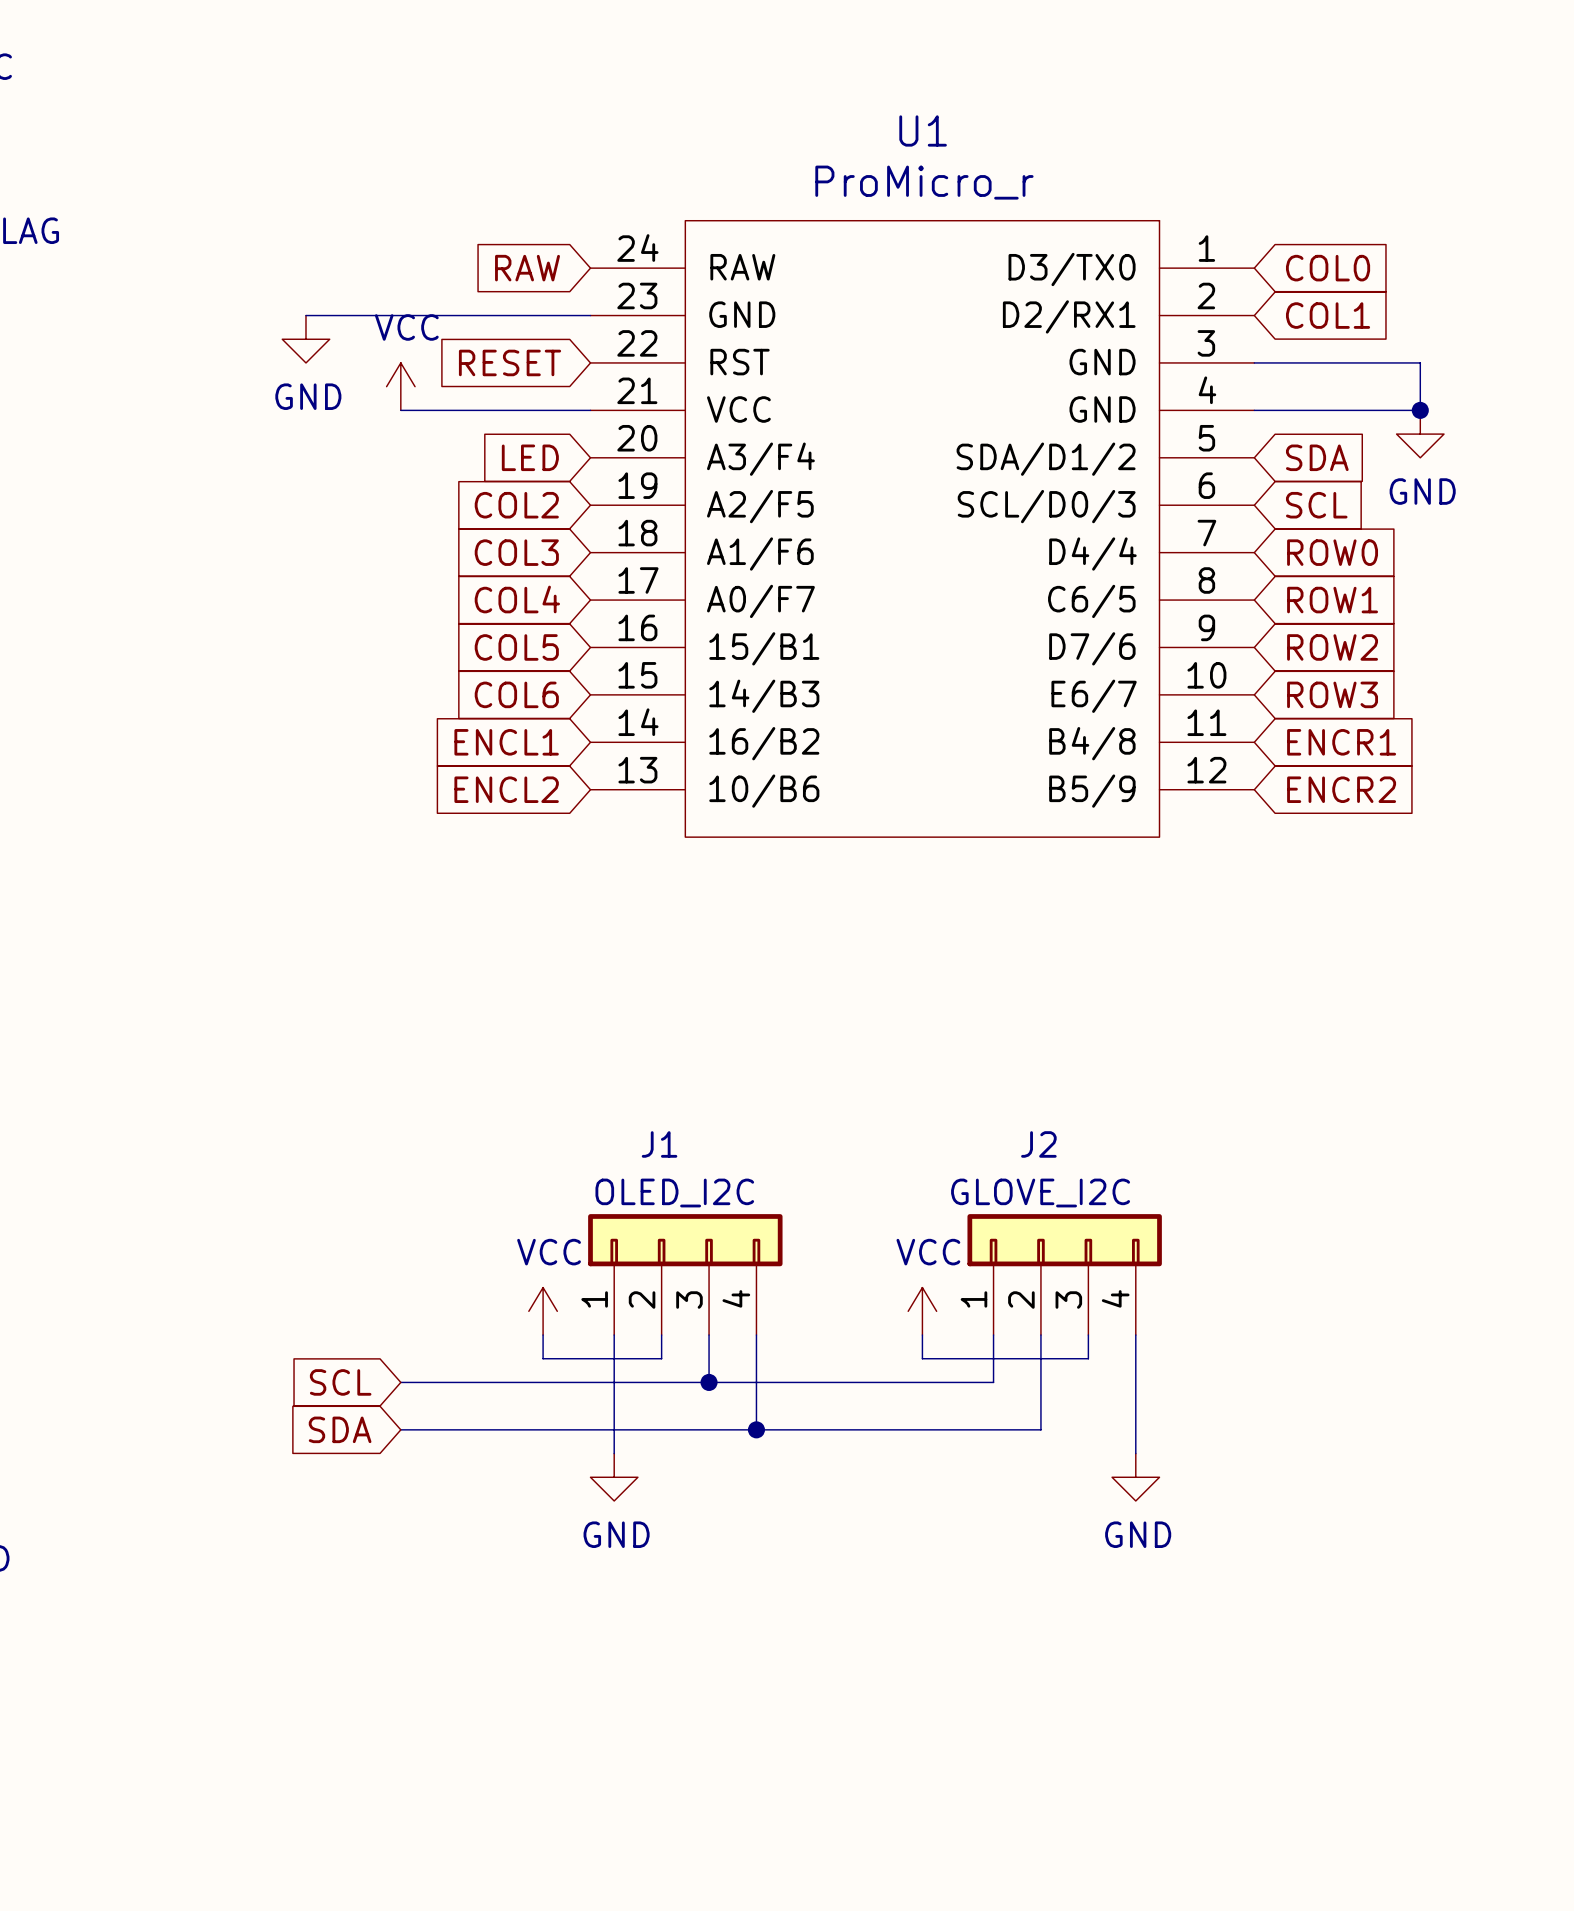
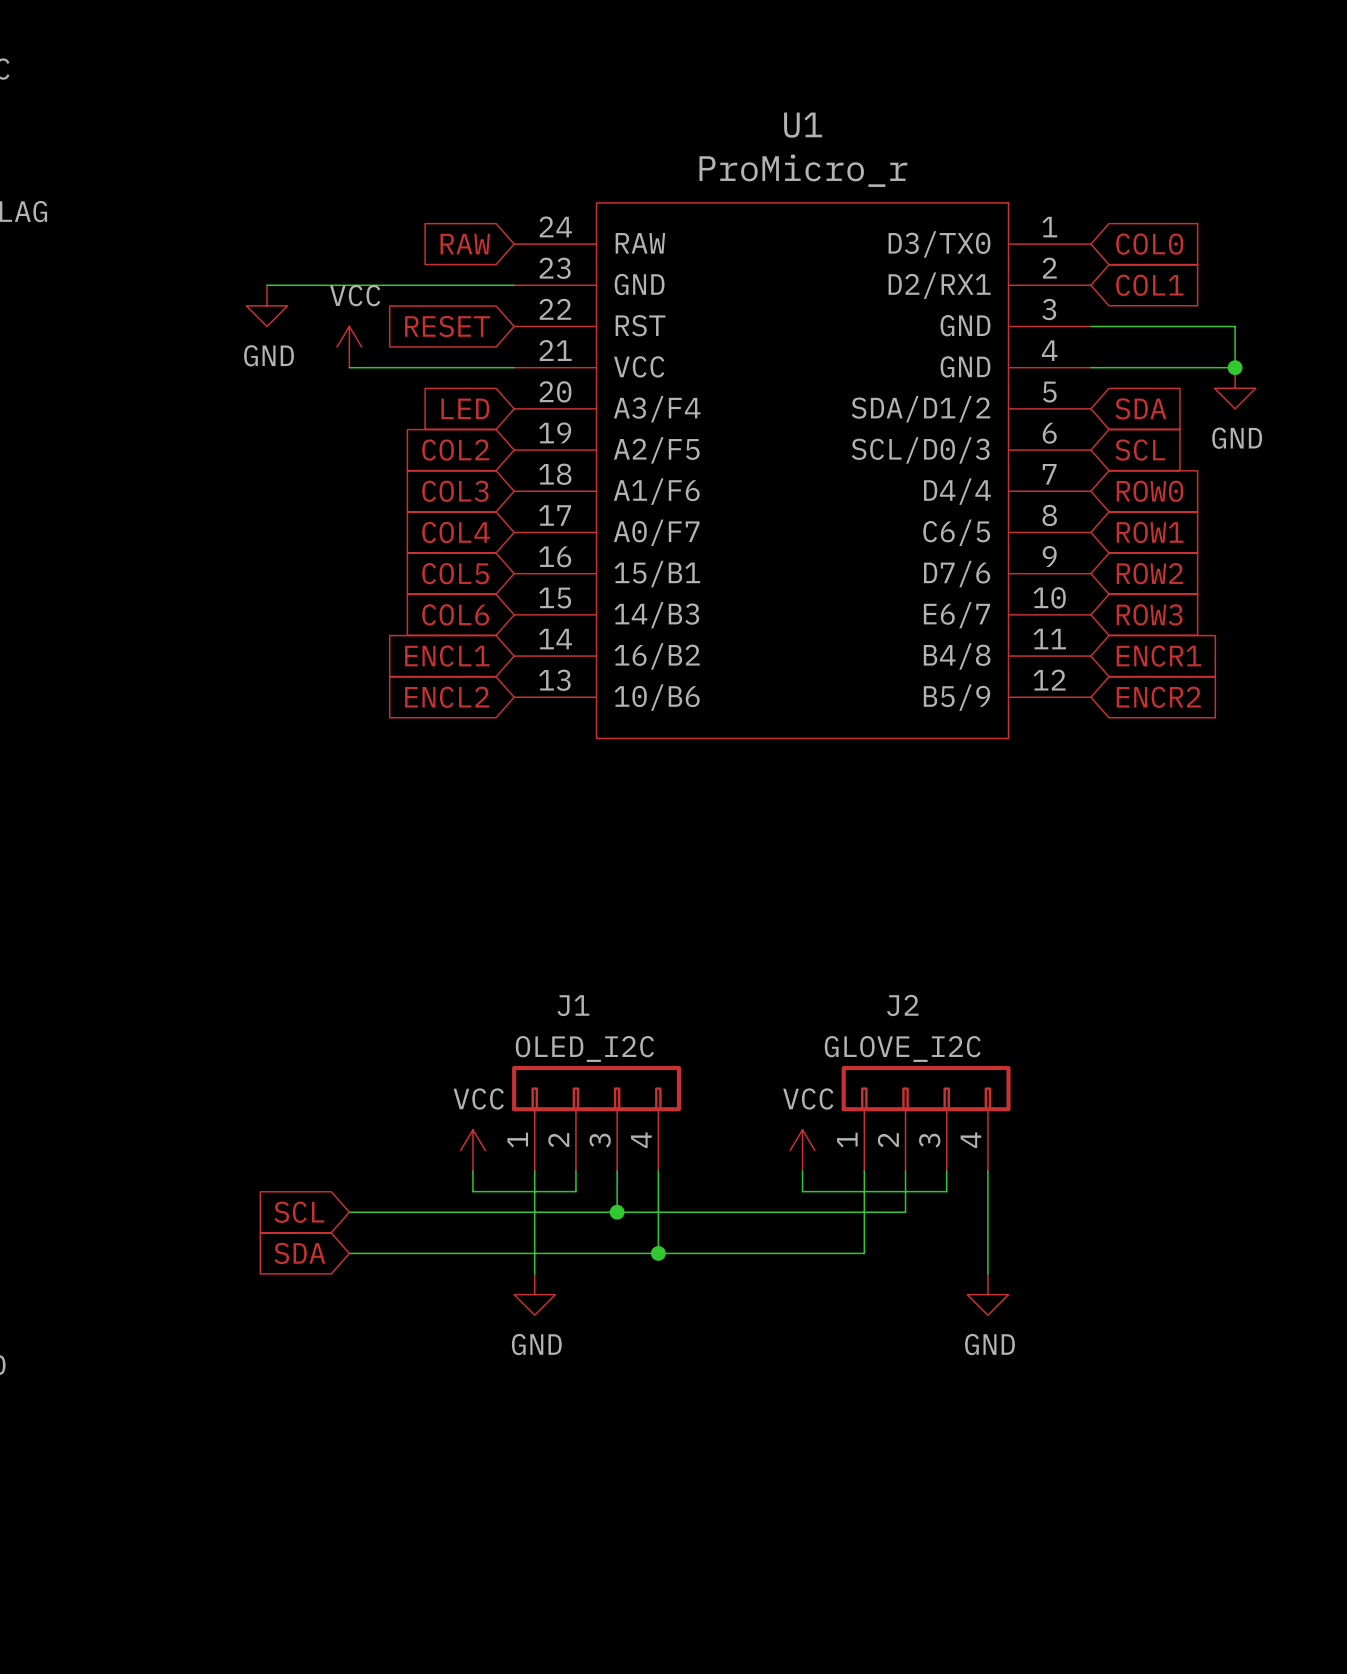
wire: (1040, 1382) (1040, 1429) (993, 1429) -> (905, 1212) (864, 1212) (864, 1253)

